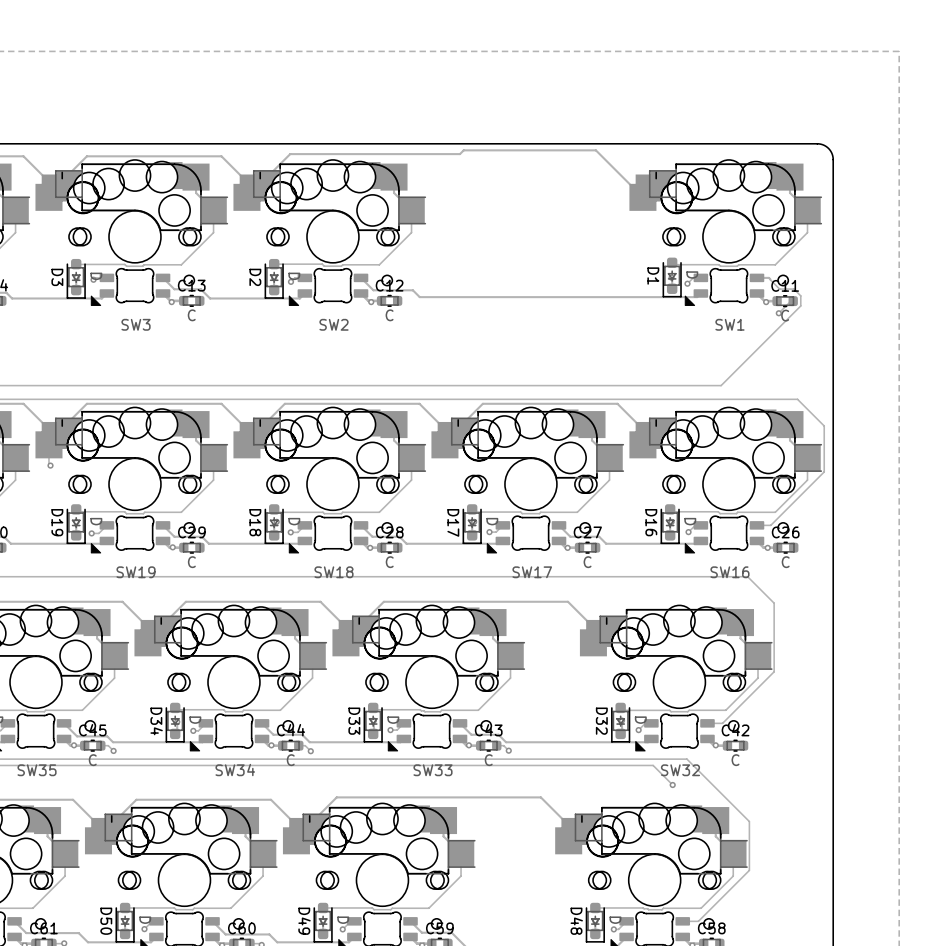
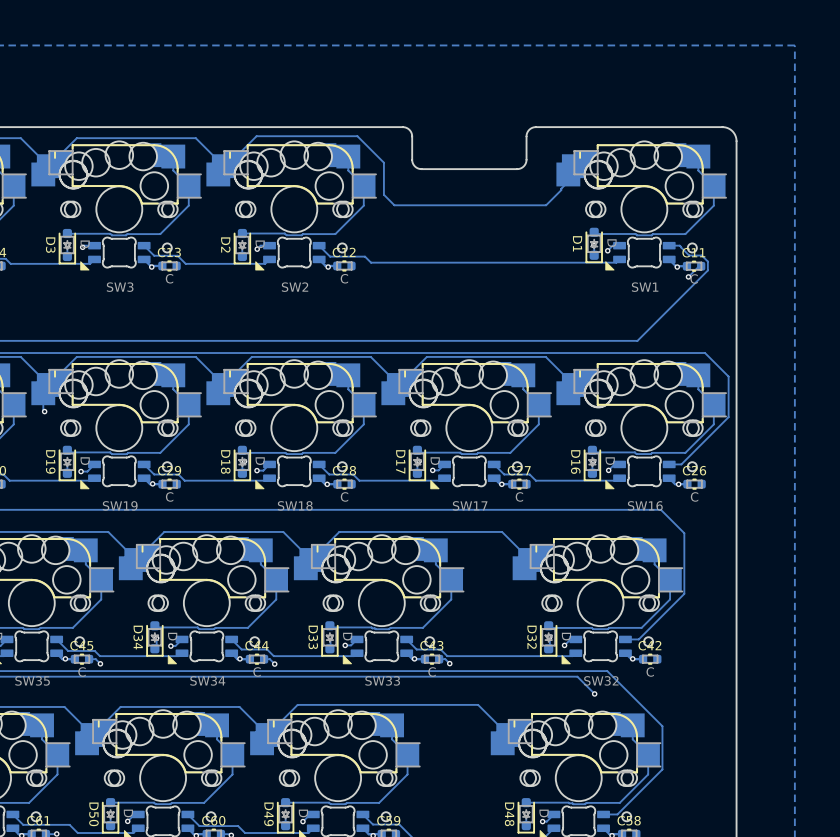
board edge: (606, 143) (455, 143) -> (535, 127) (530, 129) (527, 132) (526, 162) (522, 167) (517, 169) (417, 168) (412, 161) (411, 132) (407, 128) (402, 127)
track: (404, 154) (459, 154) (463, 150) (595, 150) (642, 197) -> (357, 136) (383, 162) (383, 194) (394, 205) (546, 205) (568, 181) (568, 174)

